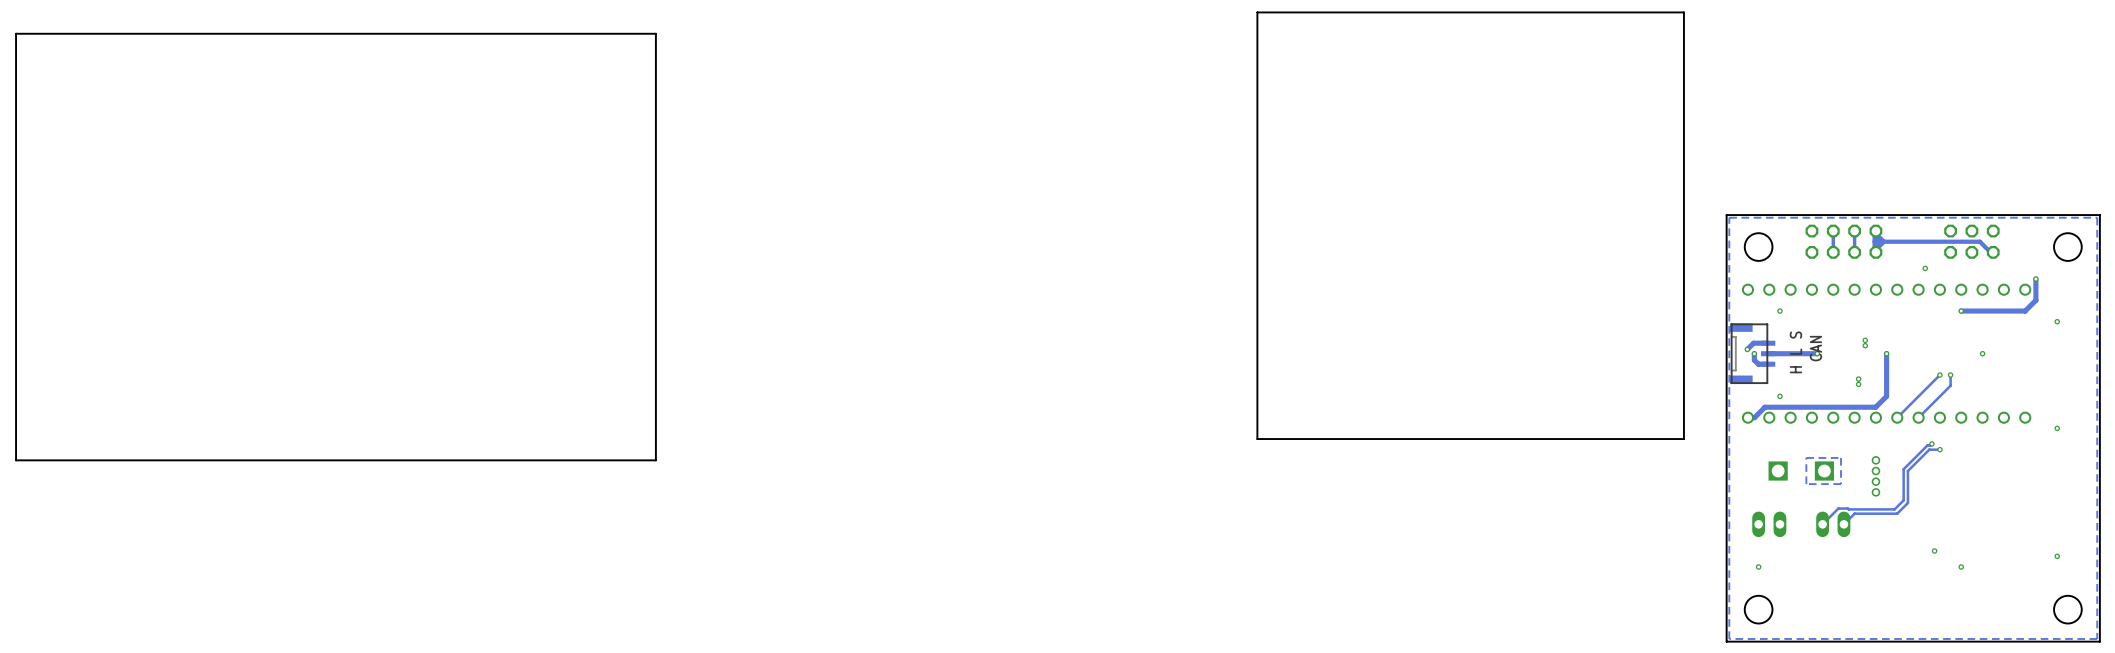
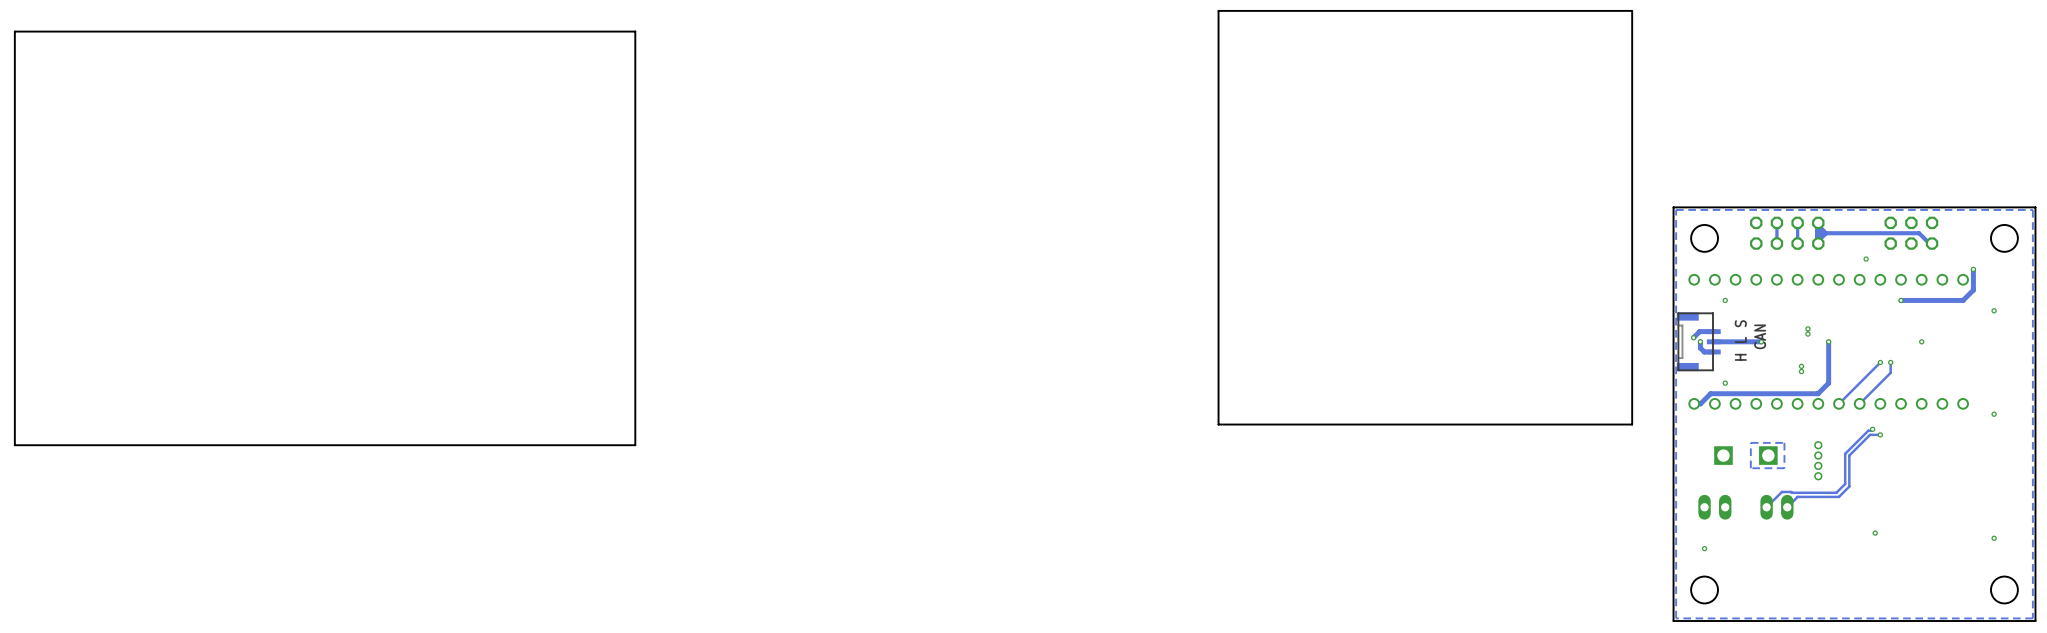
via: (1961, 566) -> none

